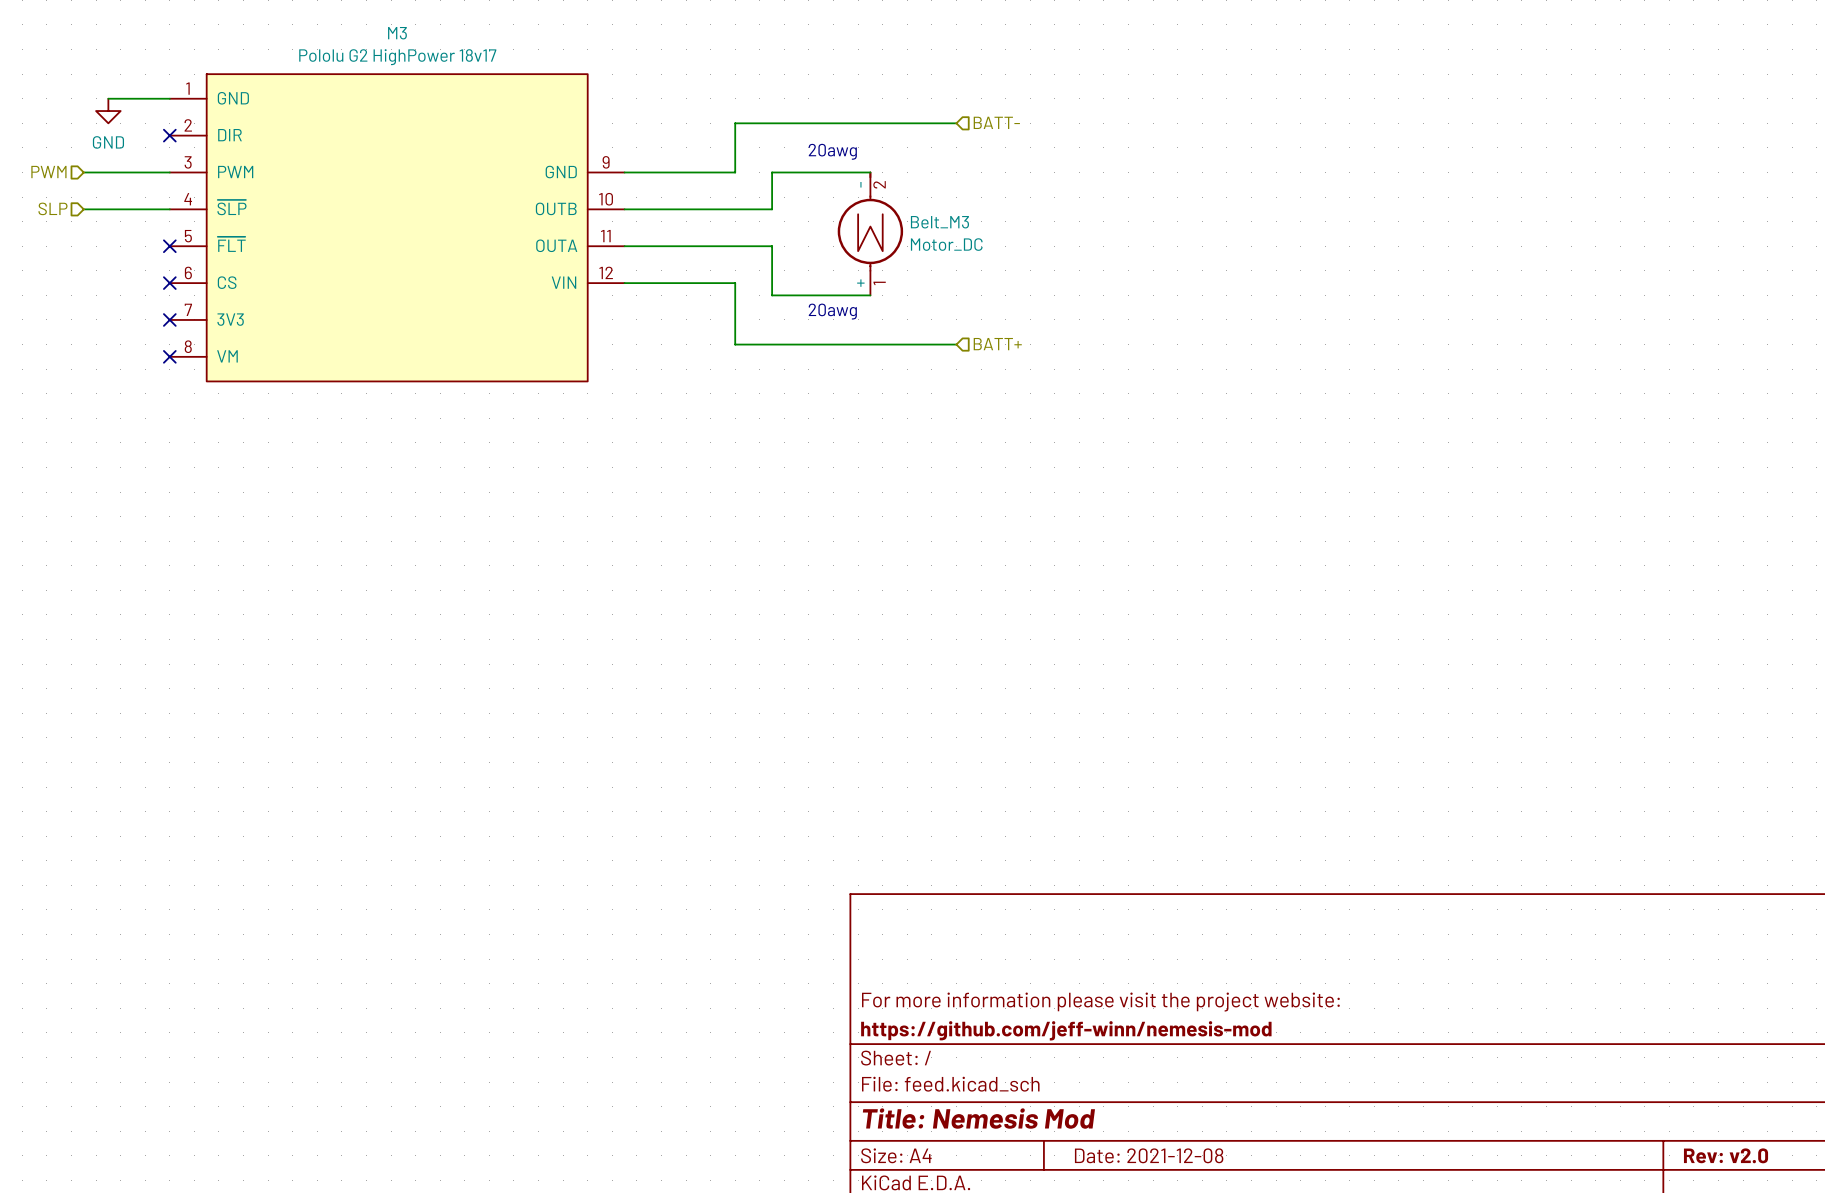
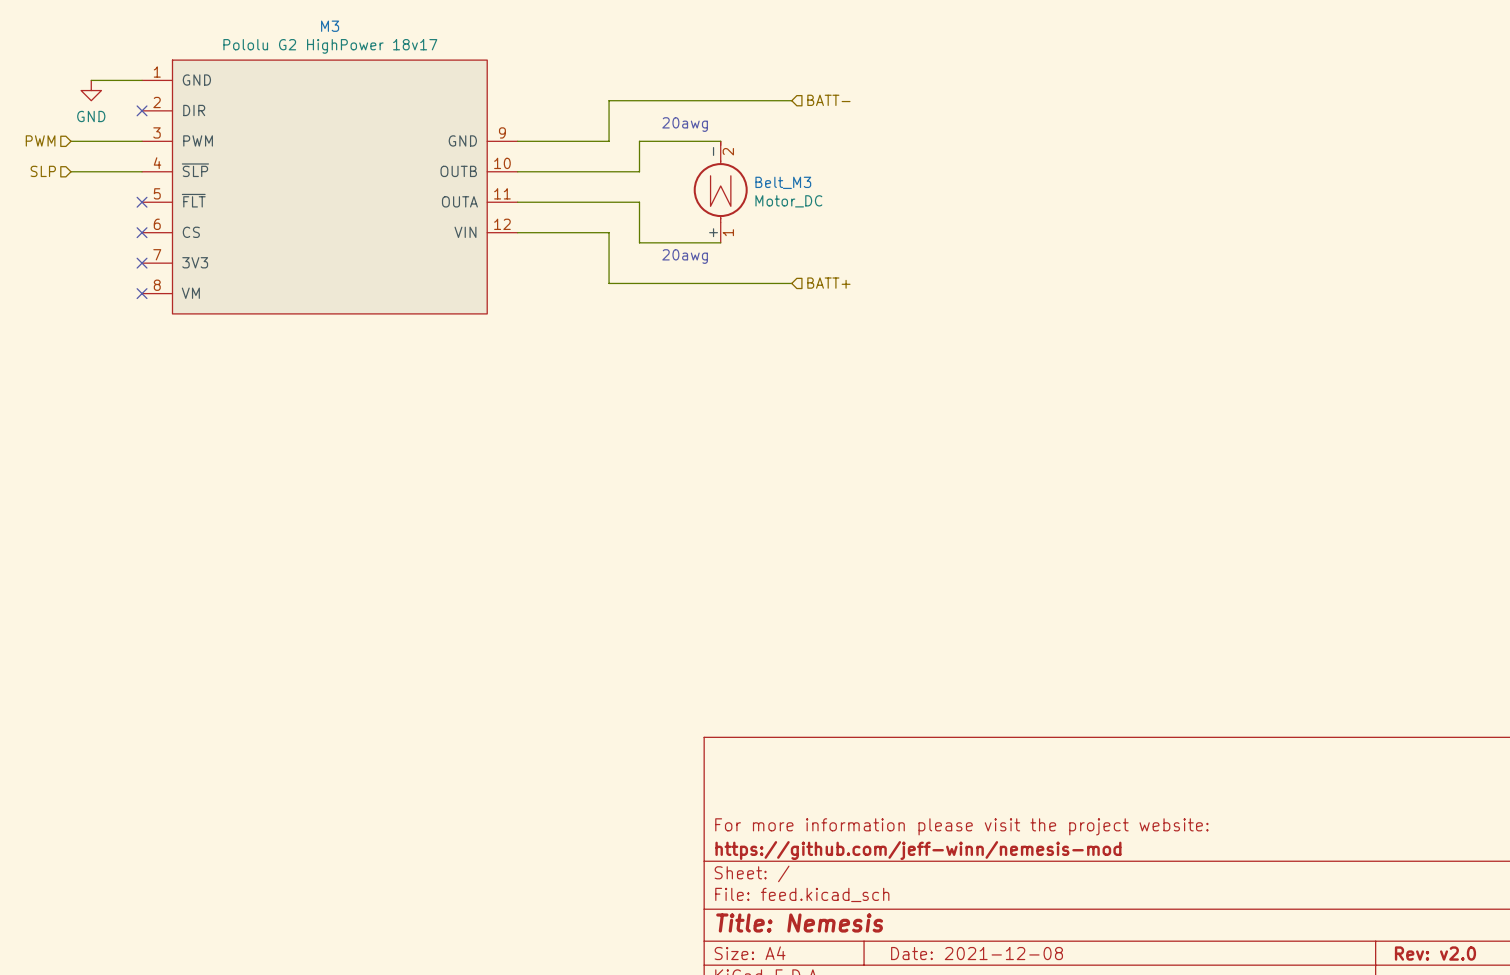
title block: Title: Nemesis Mod (978, 1118) -> Title: Nemesis (799, 923)

